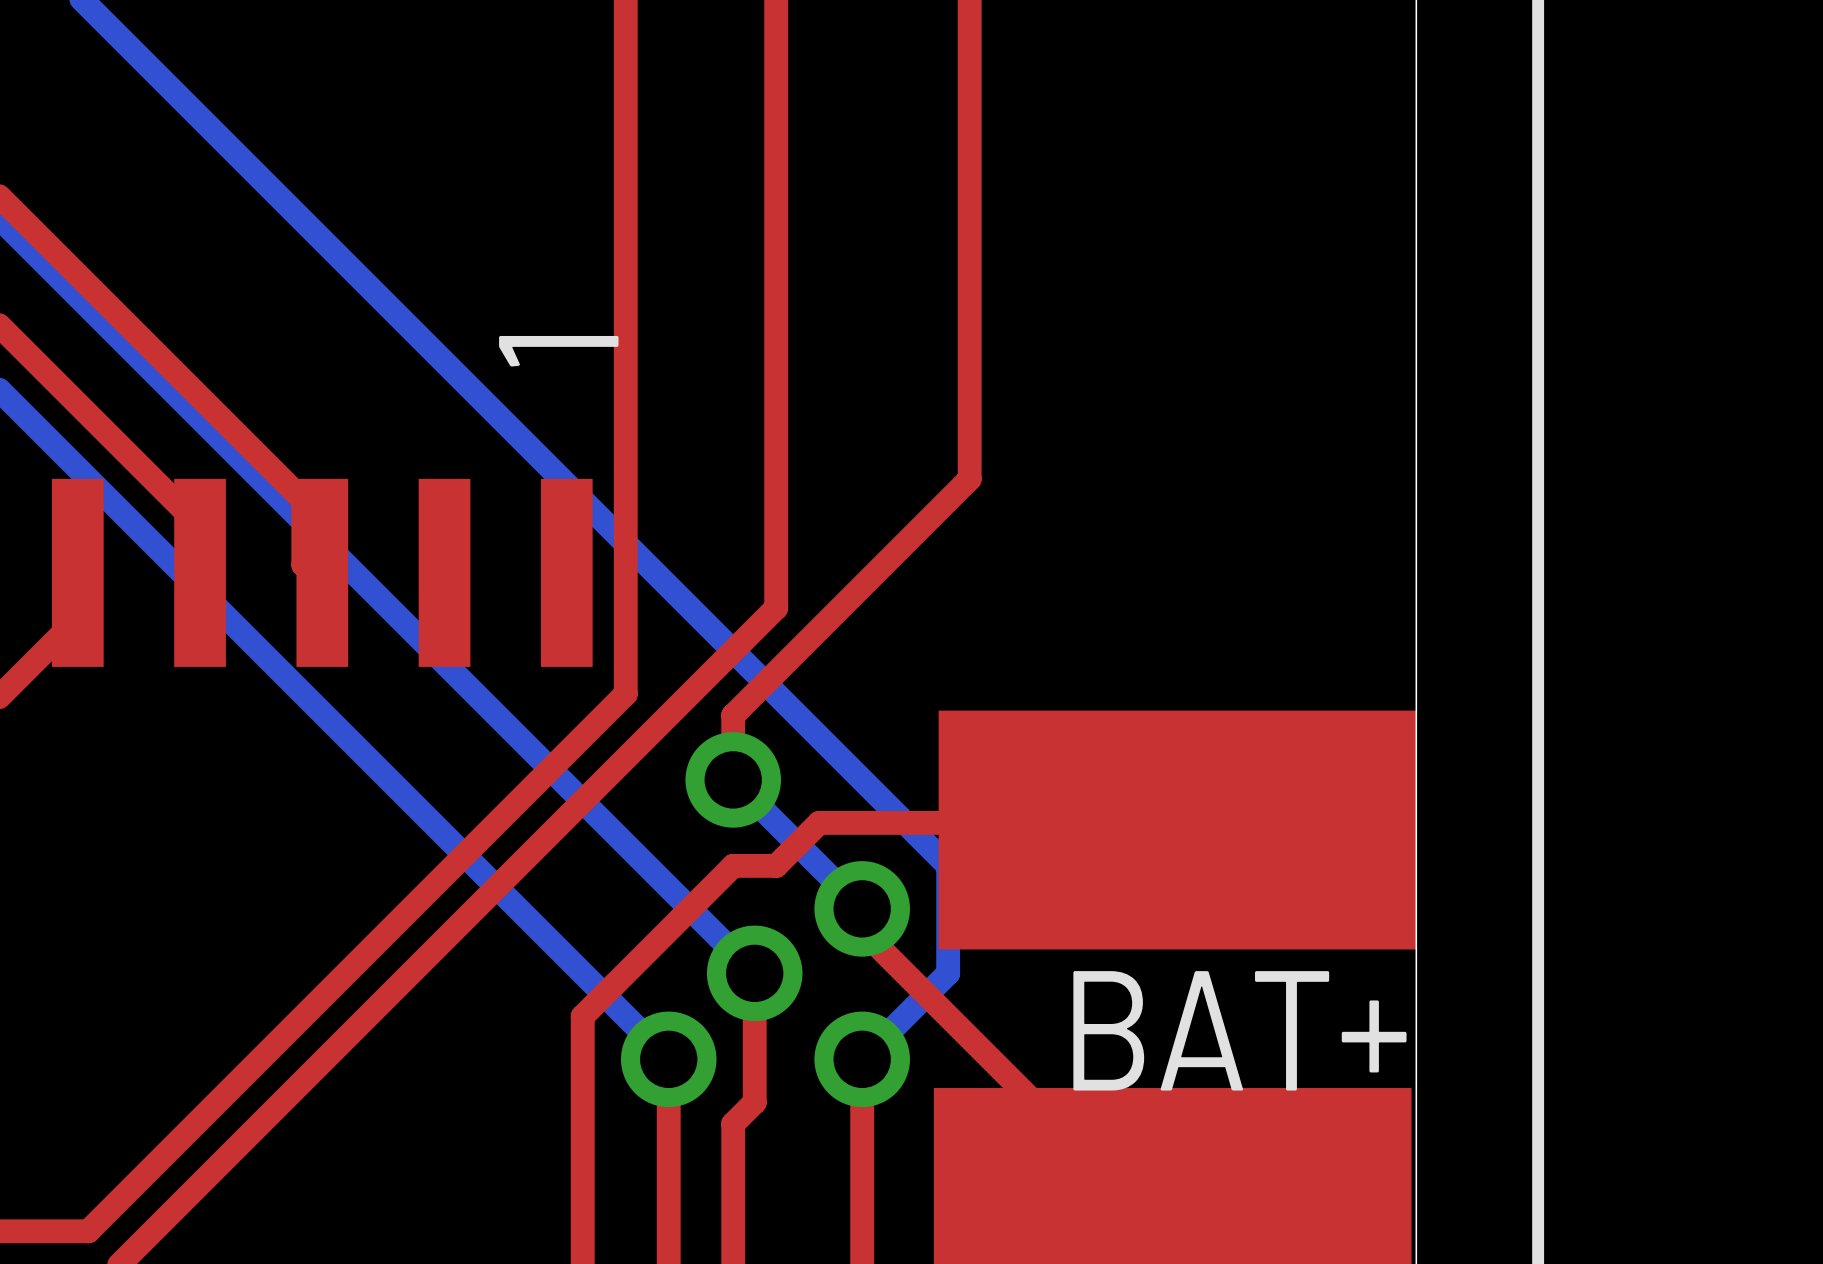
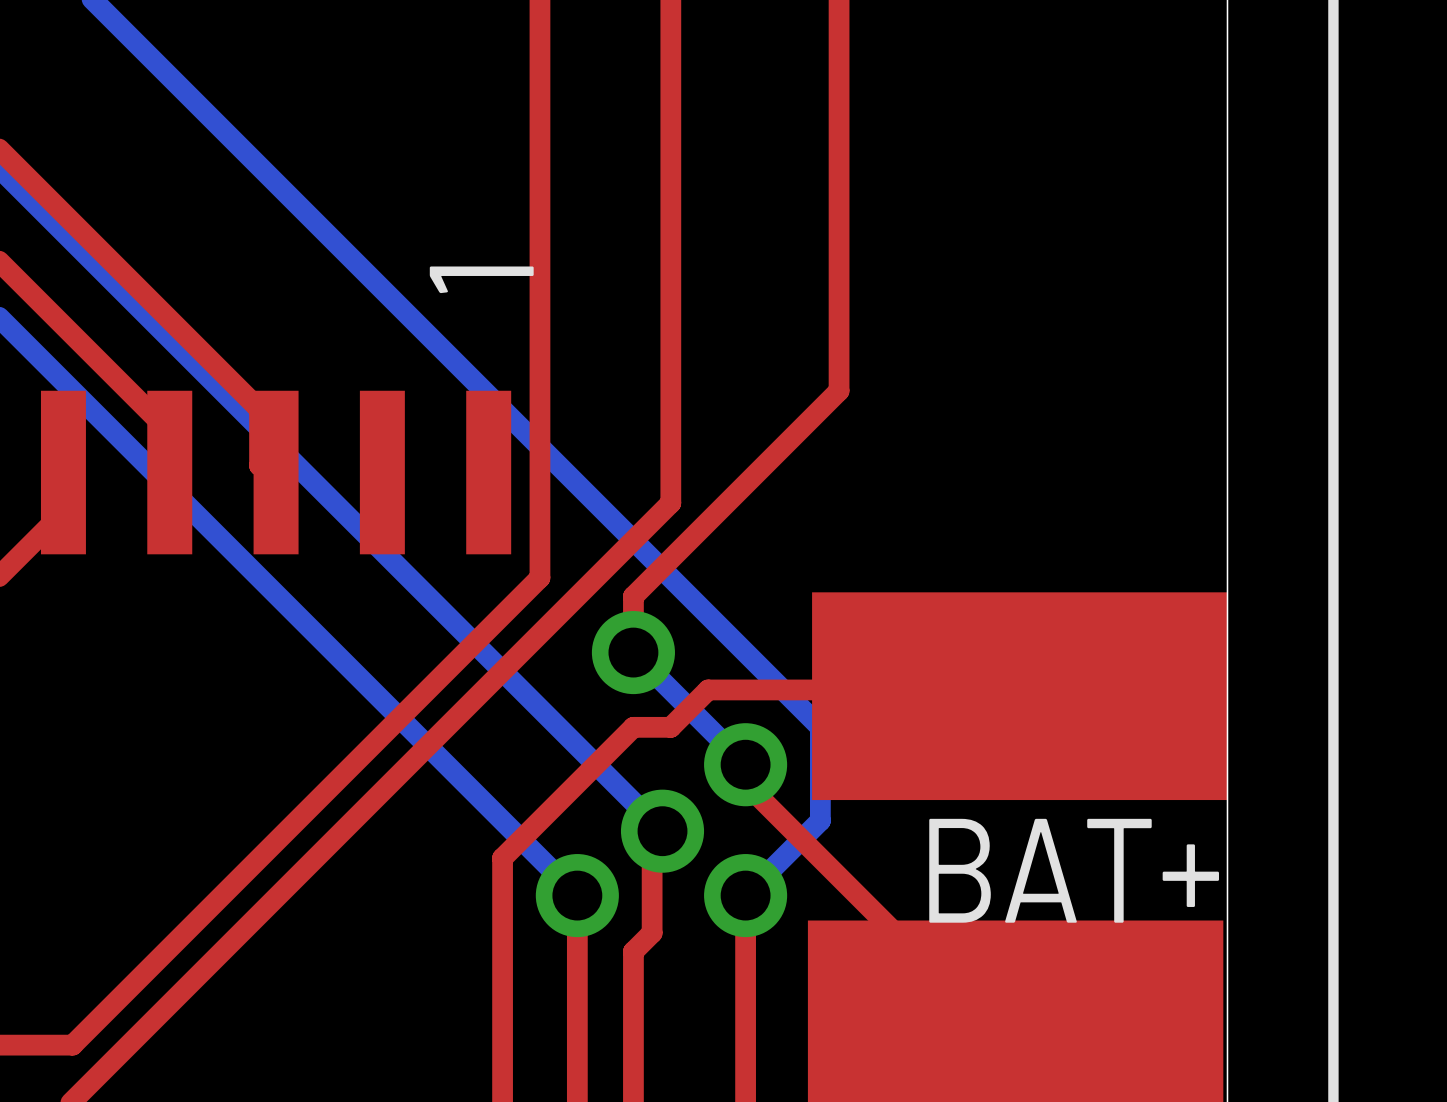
via position: (754, 973) -> (662, 831)

